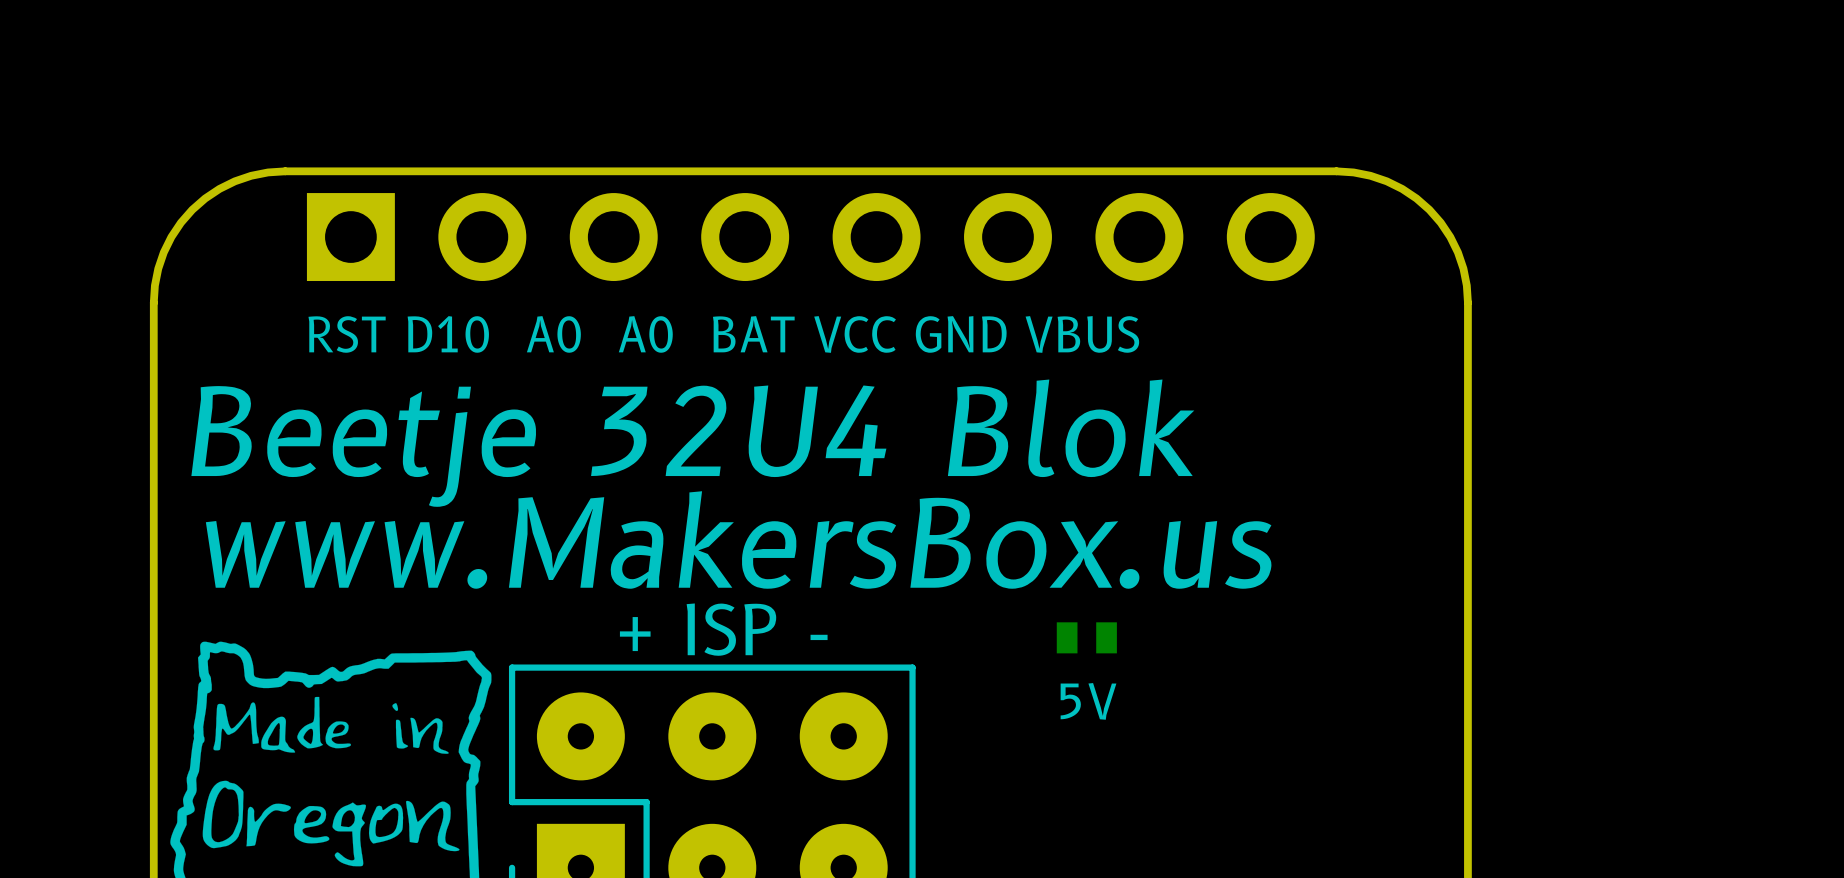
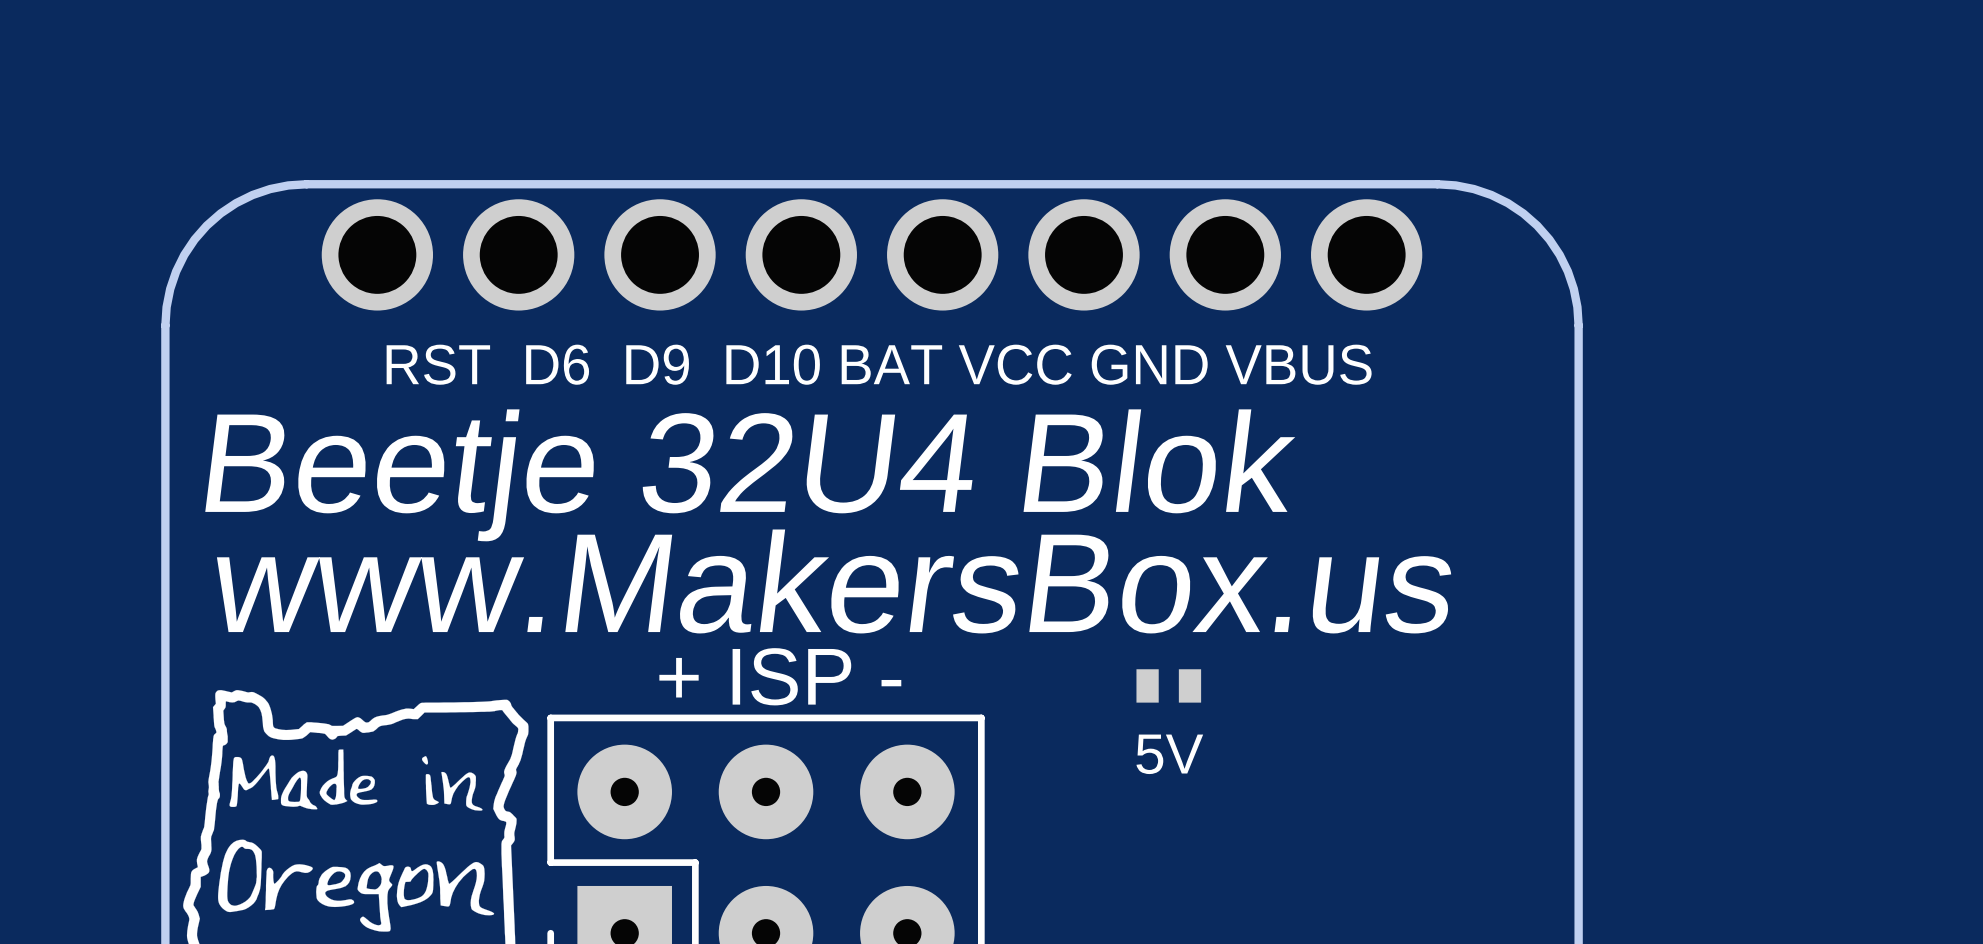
part footprint: [306, 193, 1315, 282] -> [321, 199, 1423, 311]
text: RST D10 A0 A0 BAT VCC GND VBUS (723, 334) -> none

